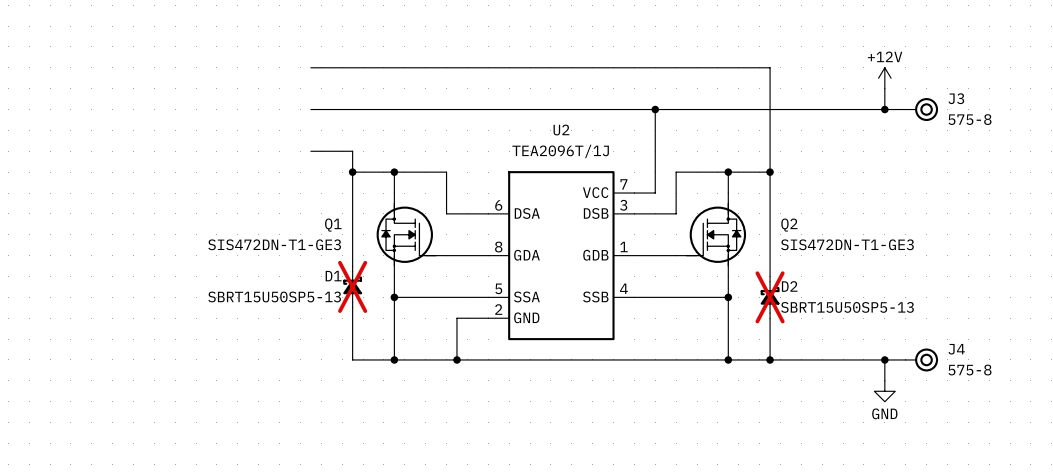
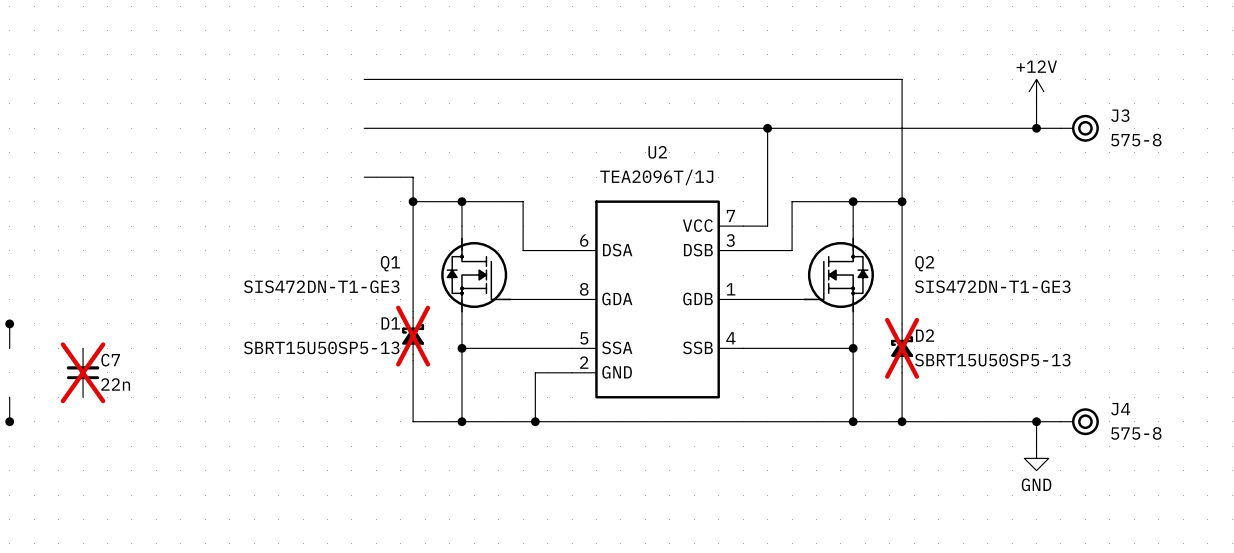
wire: none -> (9, 323) (9, 348)
junction: none -> (9, 323)
C7: none -> (83, 372)
wire: none -> (9, 397) (9, 421)
junction: none -> (9, 421)

